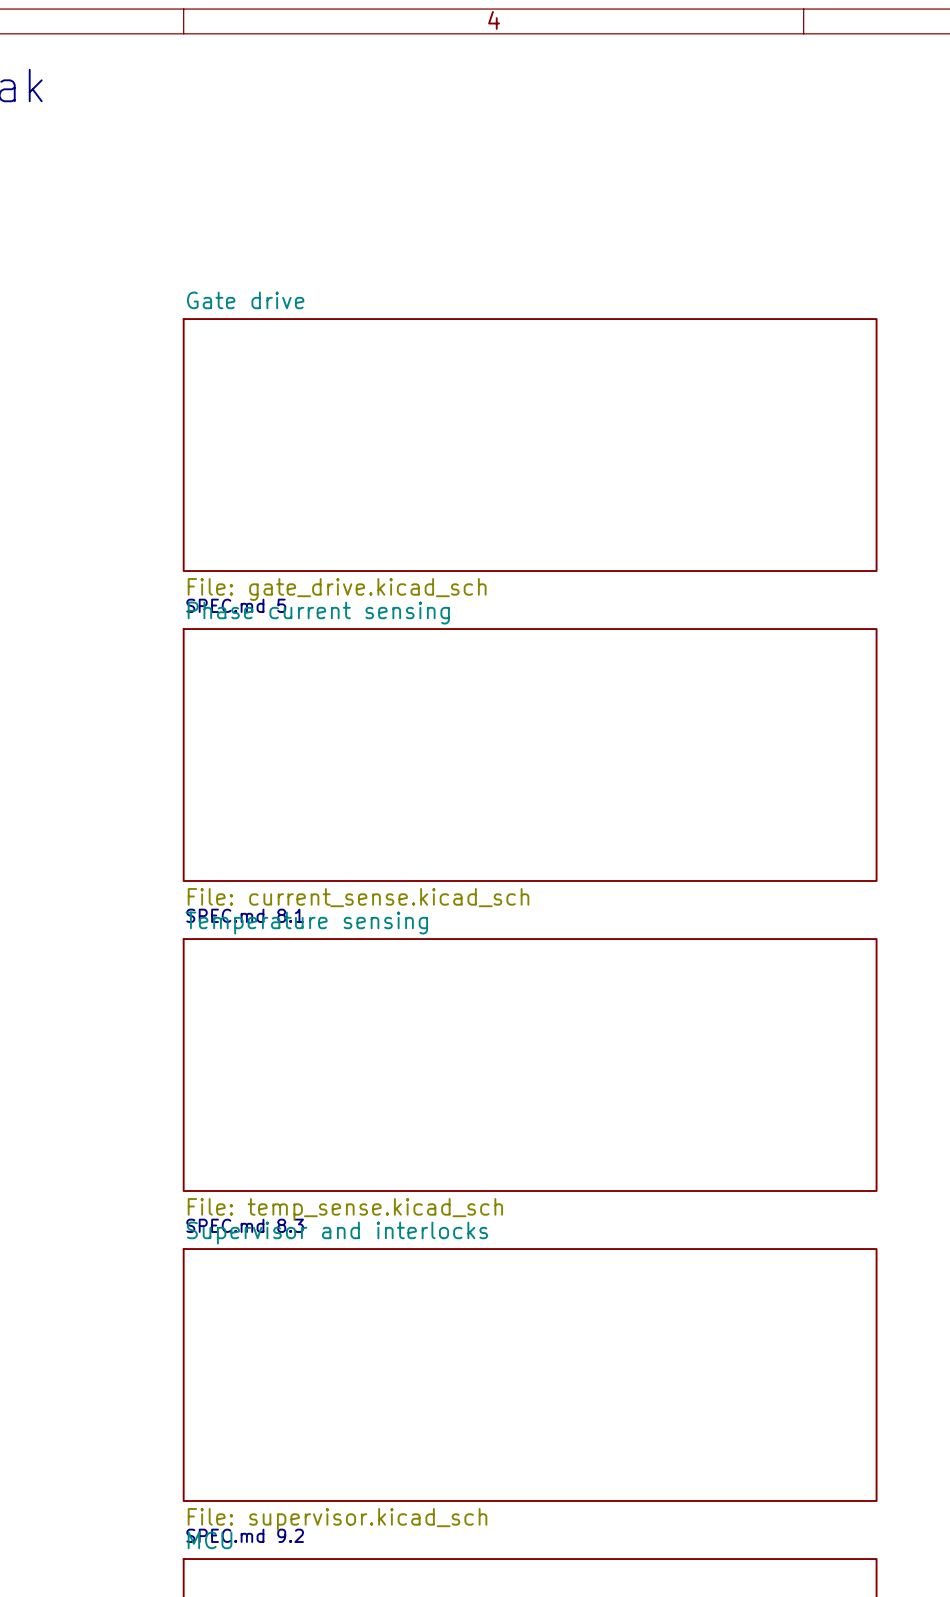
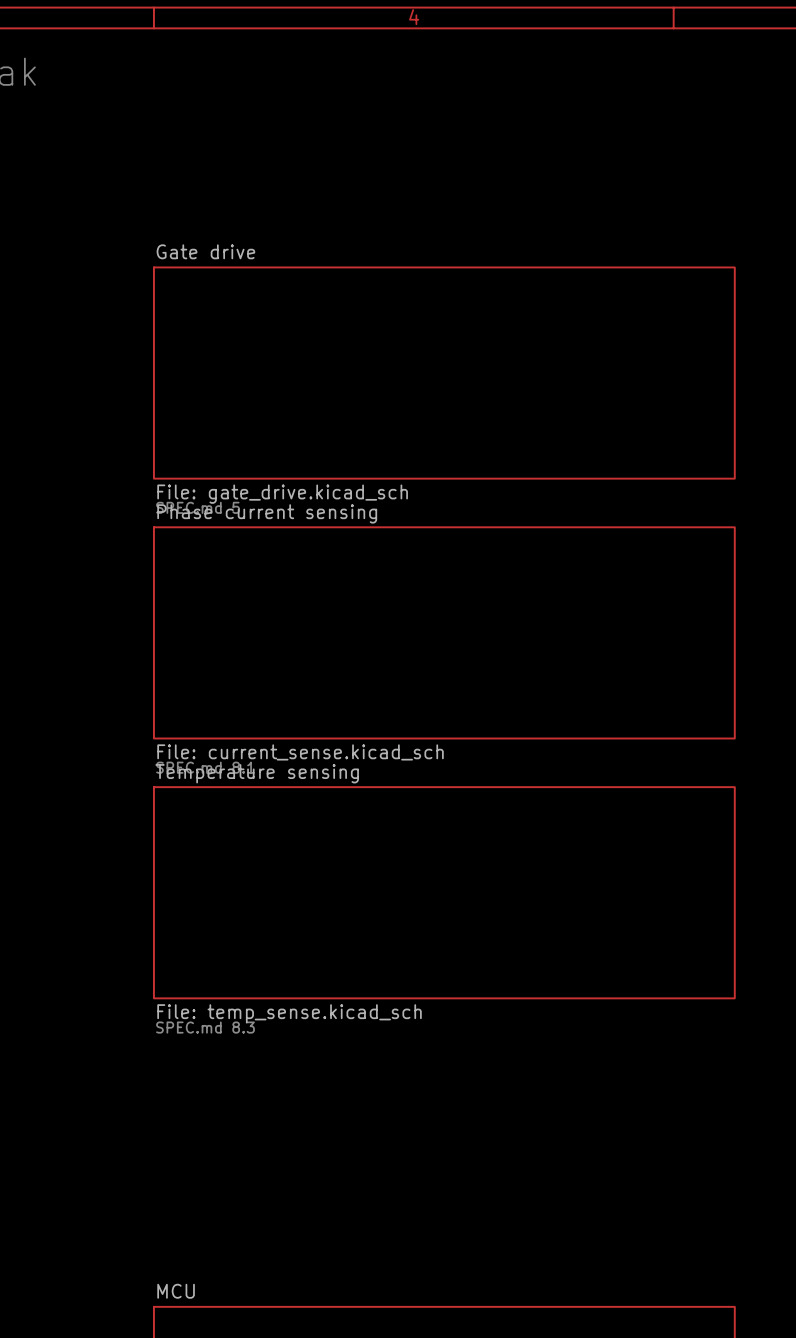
sheet Supervisor and interlocks: File: supervisor.kicad_sch (530, 1375) -> none
text: SPEC.md 9.2 (245, 1535) -> none

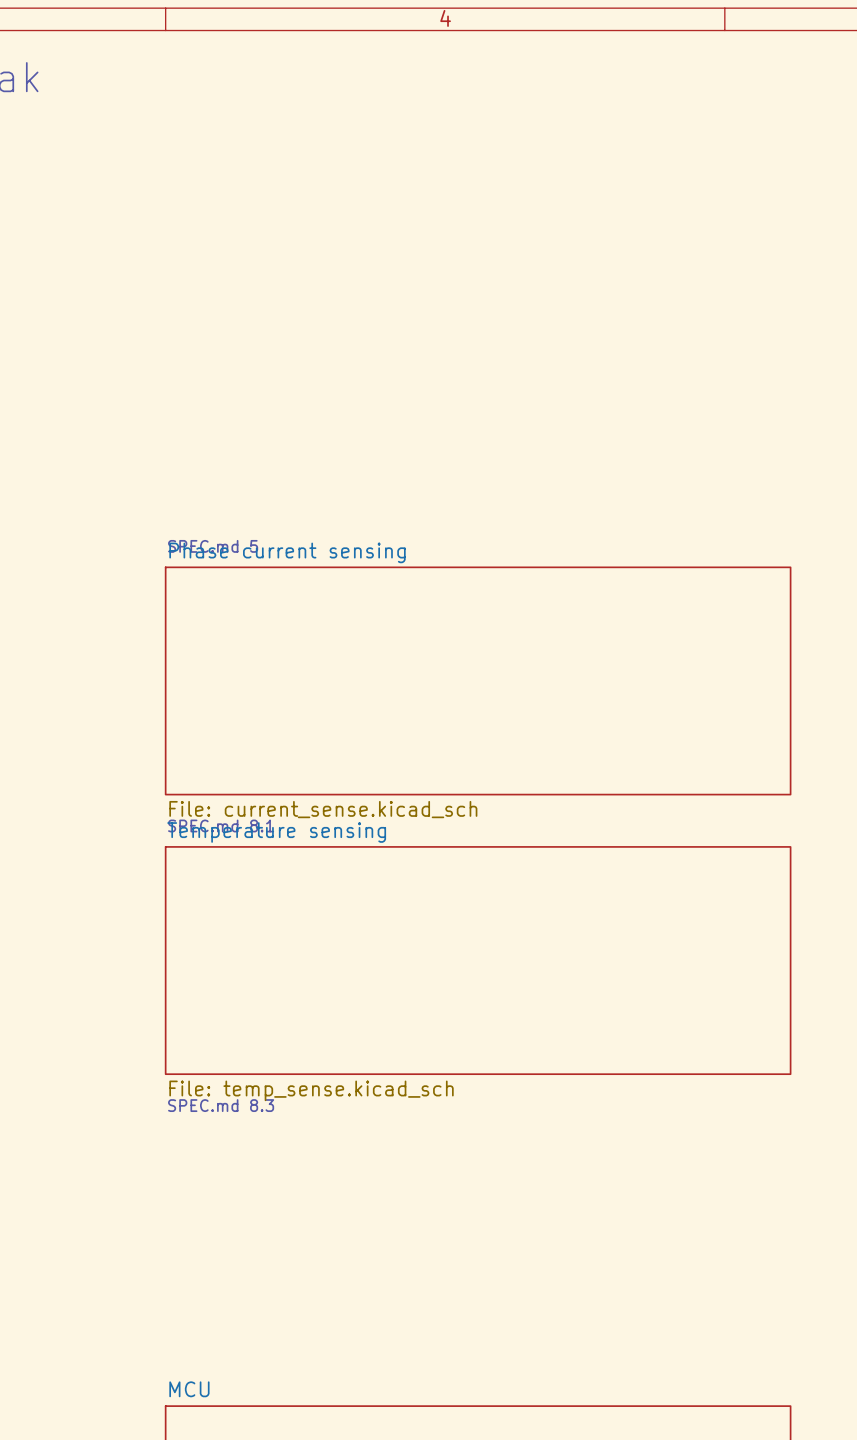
sheet Gate drive: File: gate_drive.kicad_sch (444, 373) -> none

